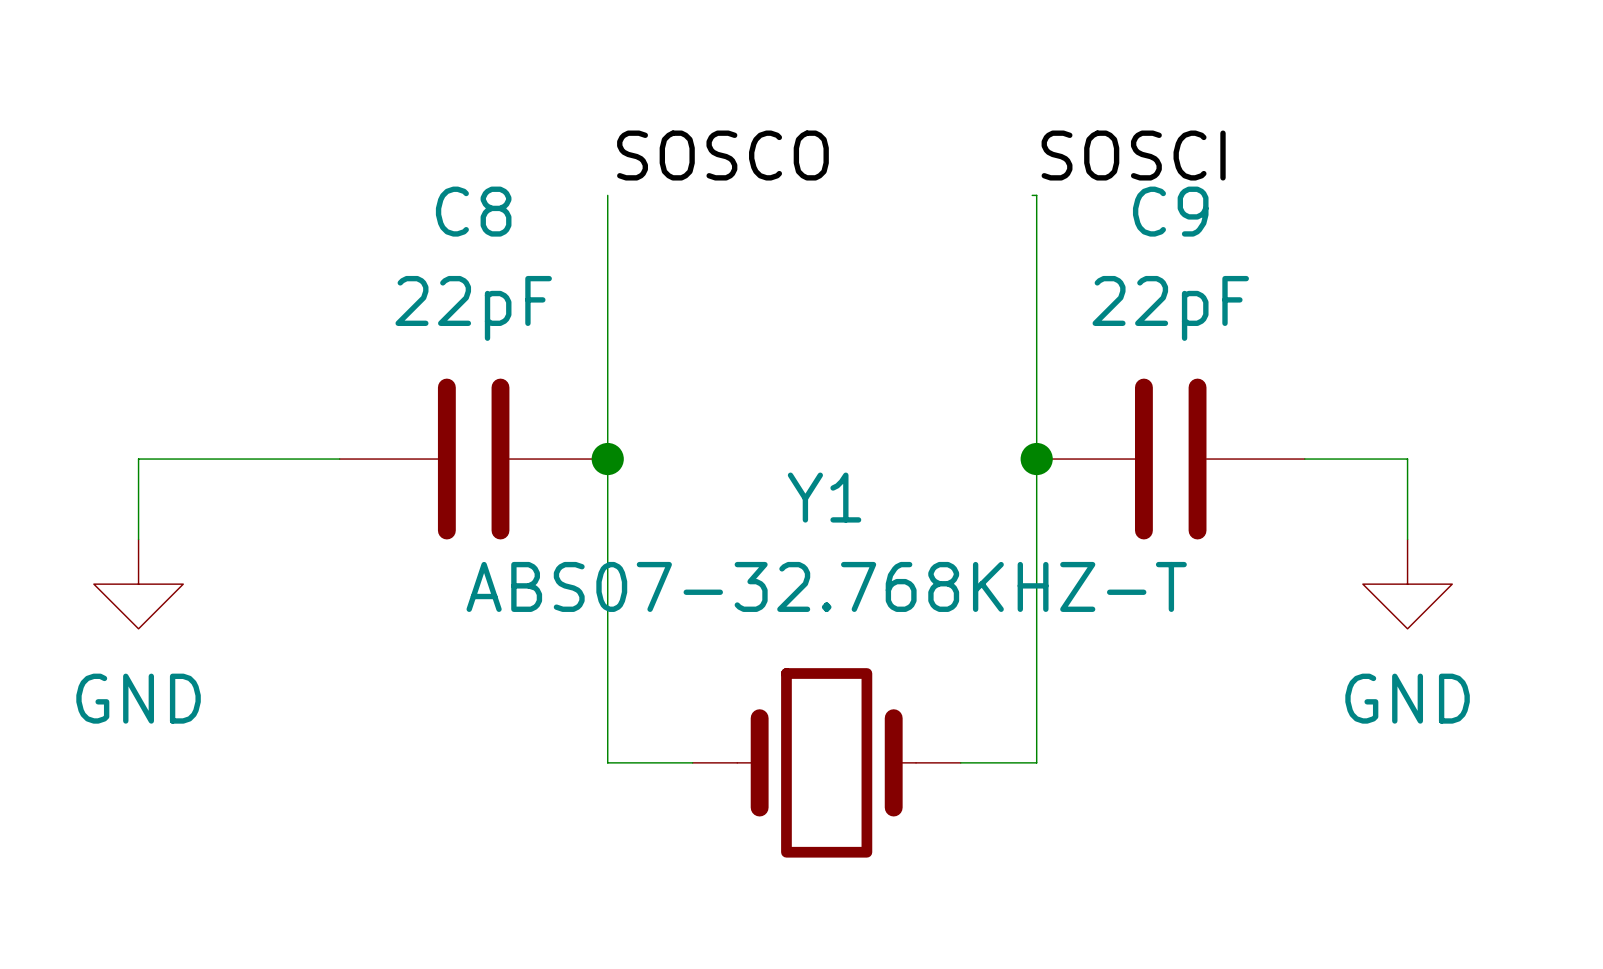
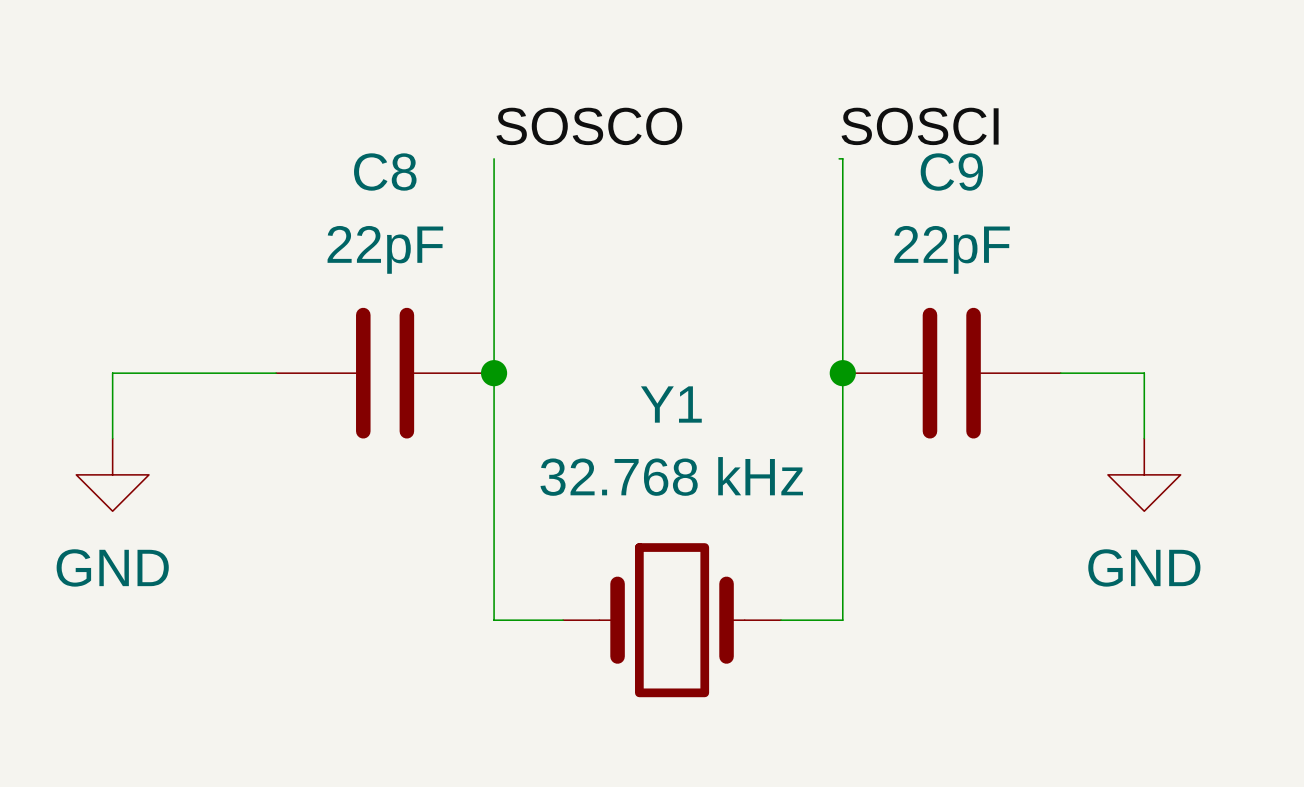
Y1 value: ABS07-32.768KHZ-T (826, 586) -> 32.768 kHz (671, 476)

